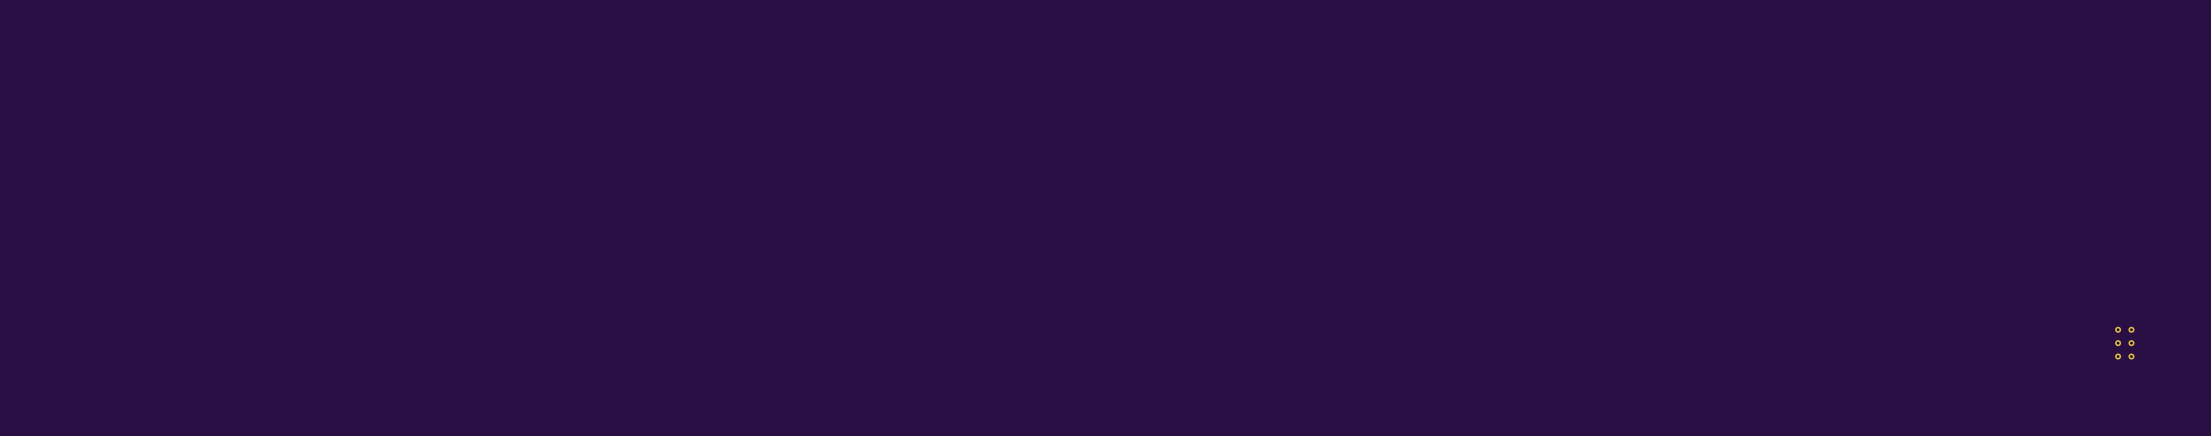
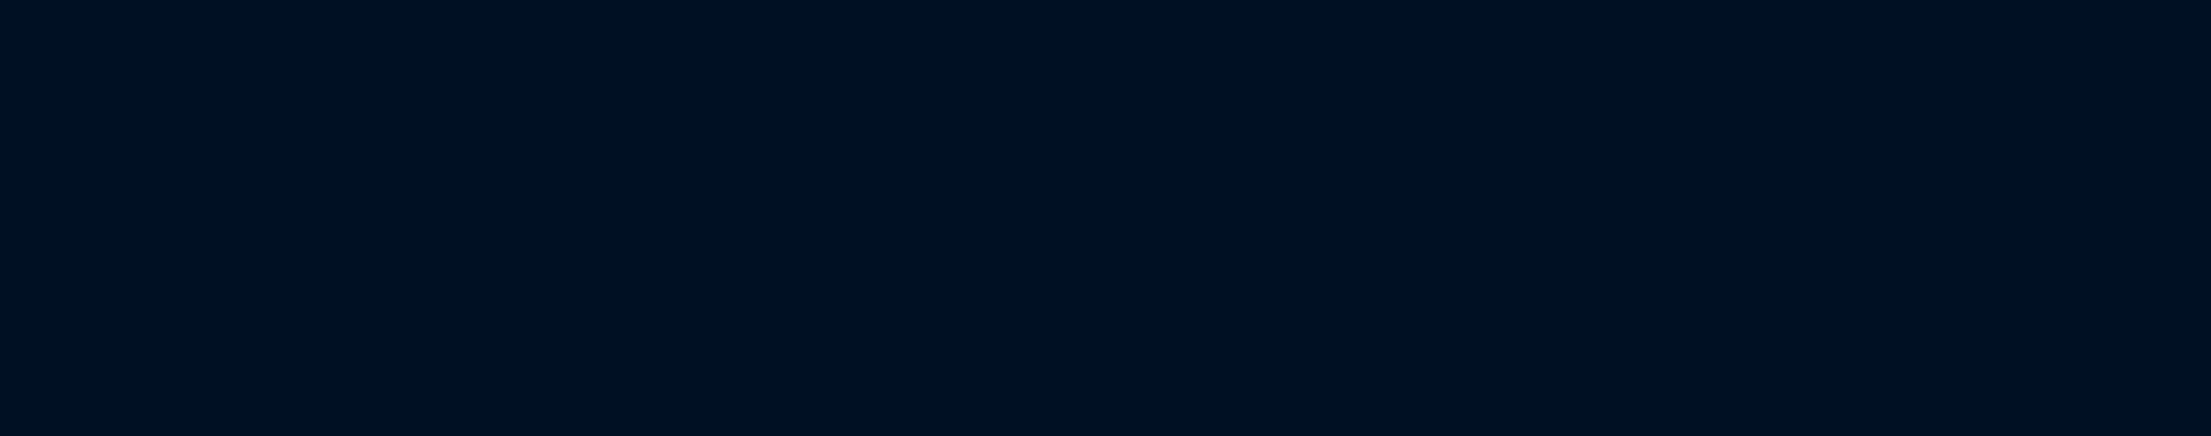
part: (2124, 343) -> none

